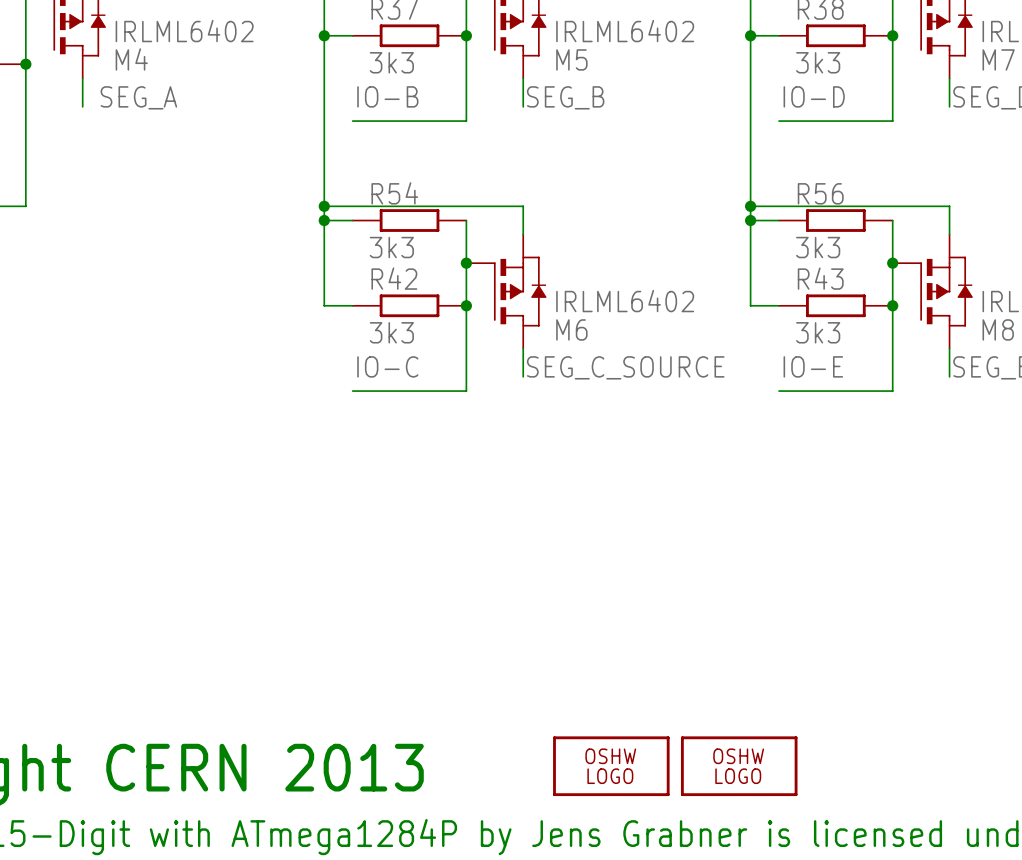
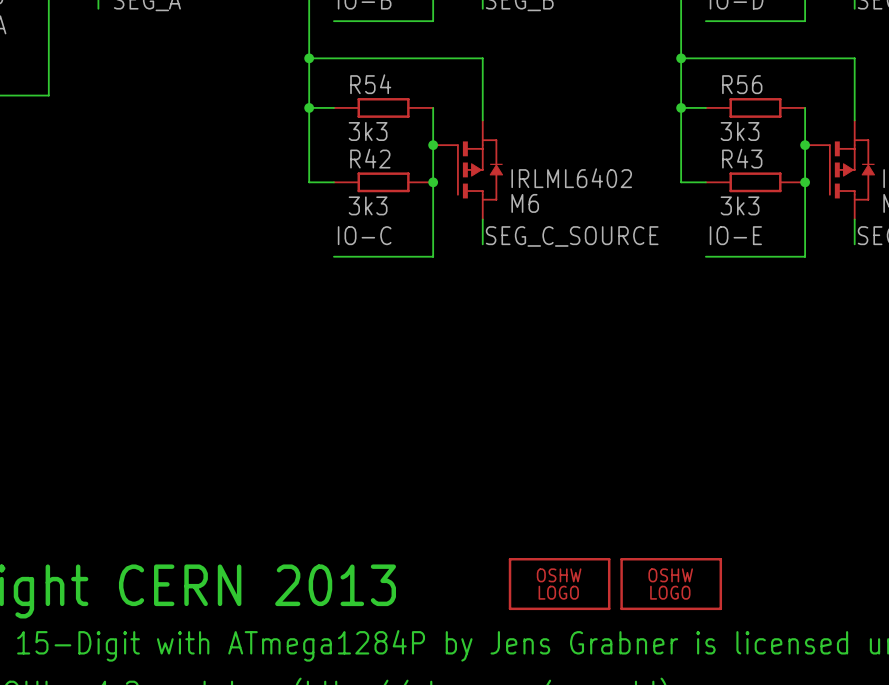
wire: (324, 206) (523, 206) -> (309, 58) (482, 58) (482, 95)
junction position: (324, 206) -> (309, 58)
wire: (750, 206) (949, 206) -> (681, 58) (854, 58) (854, 95)
junction position: (750, 206) -> (681, 58)

